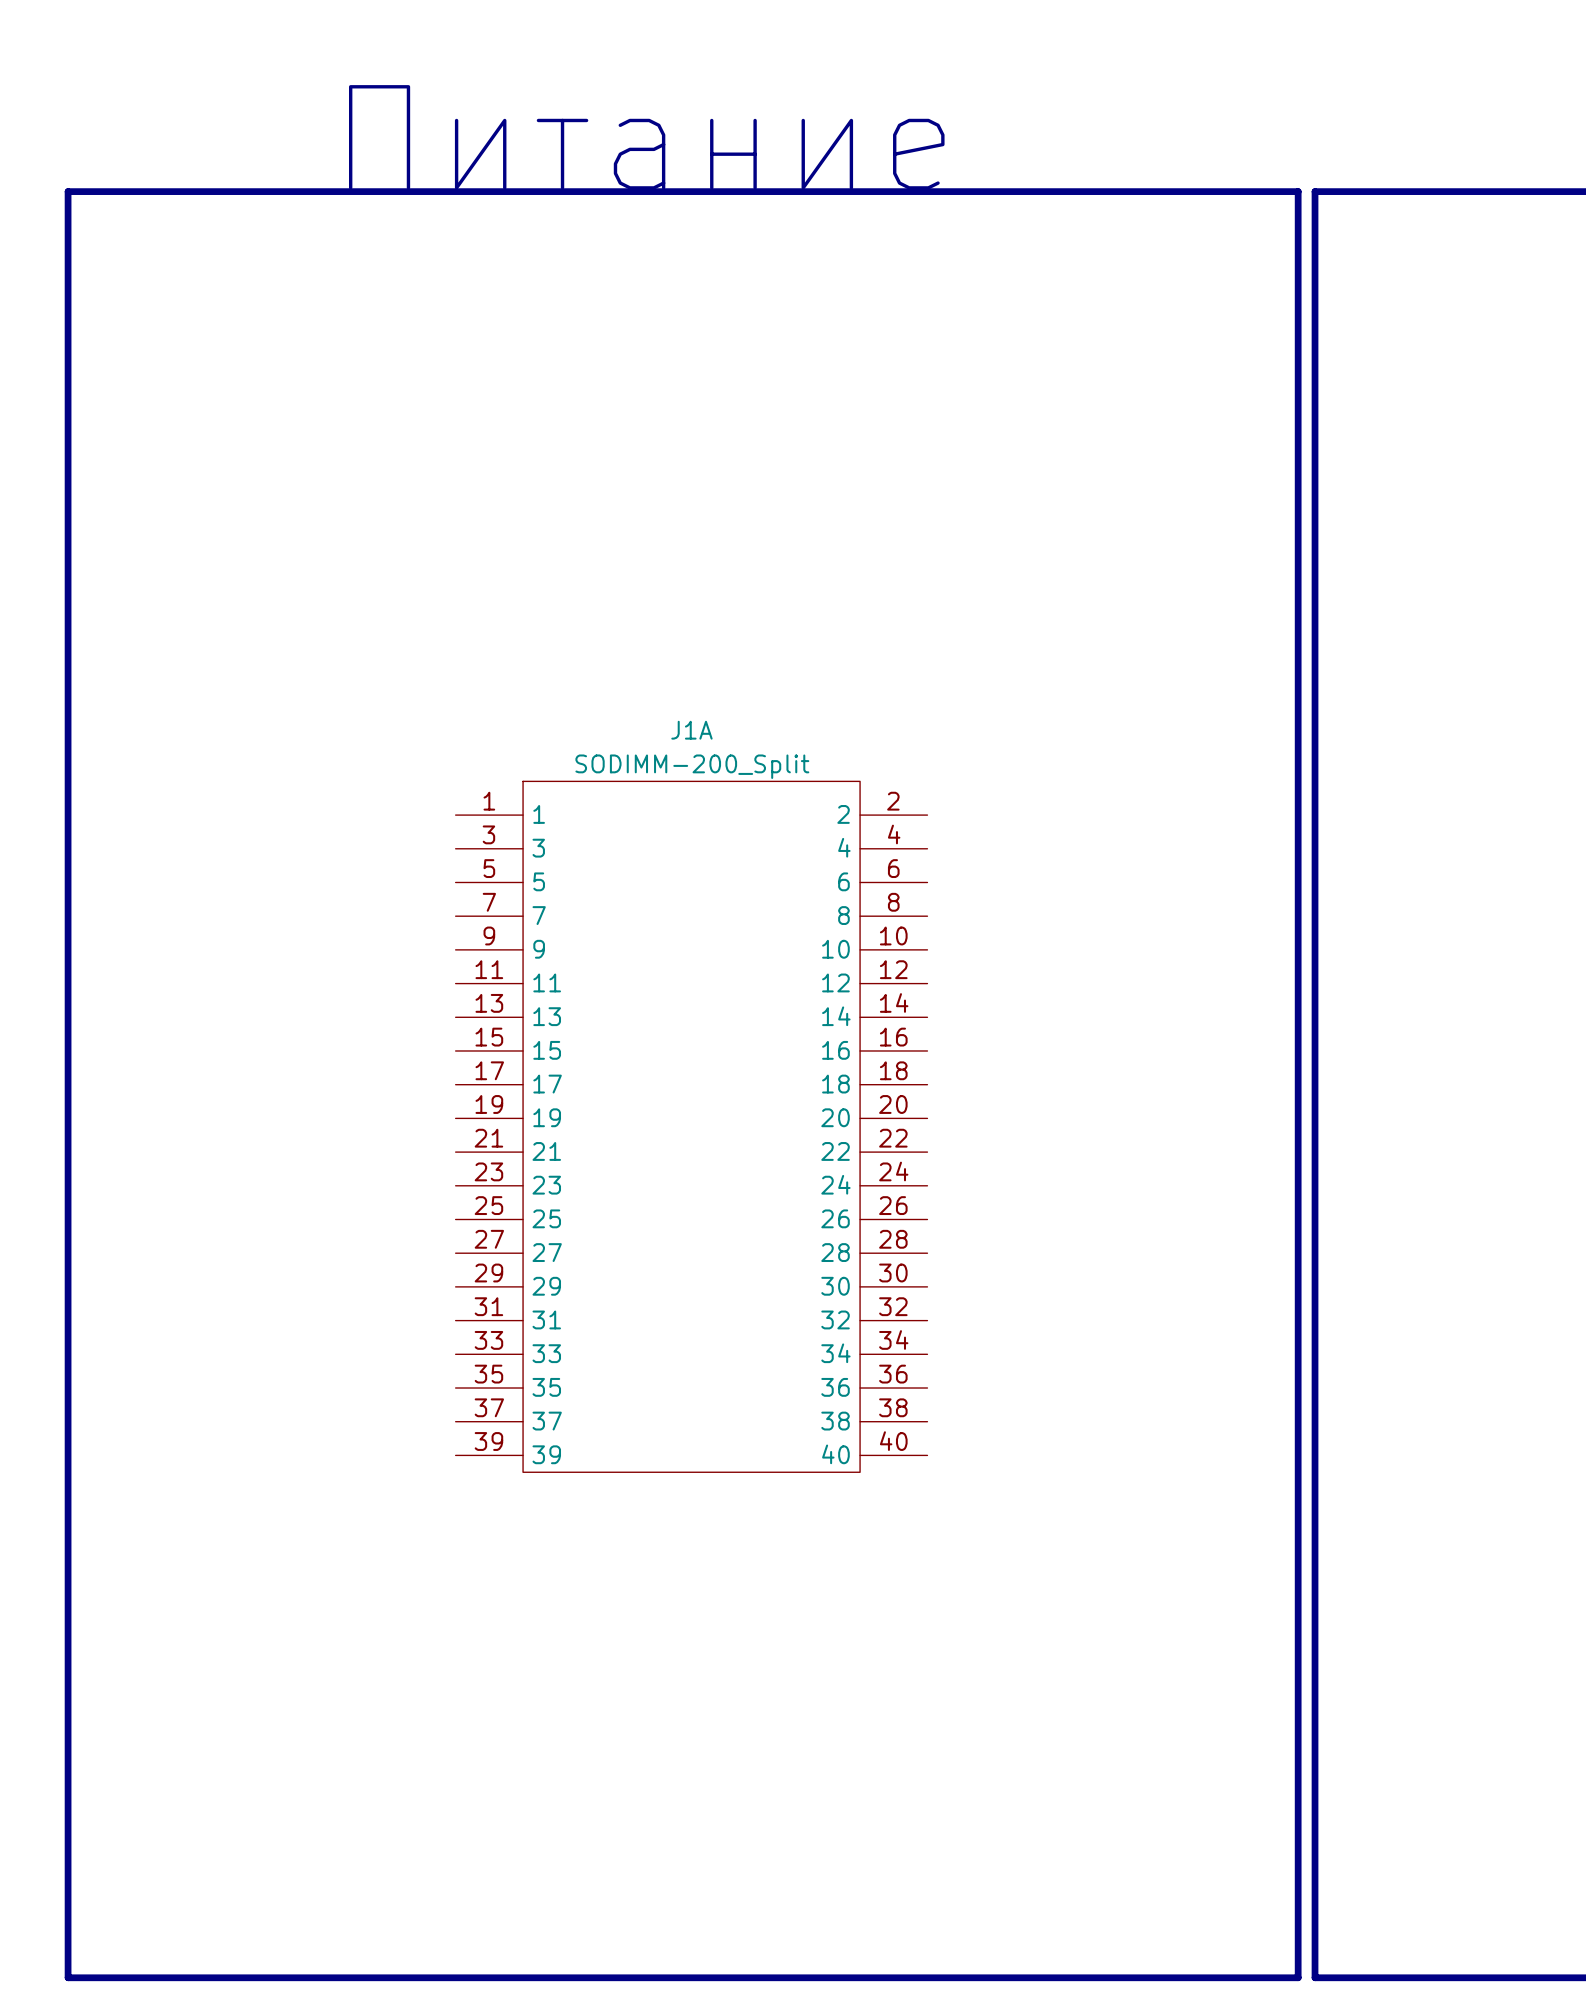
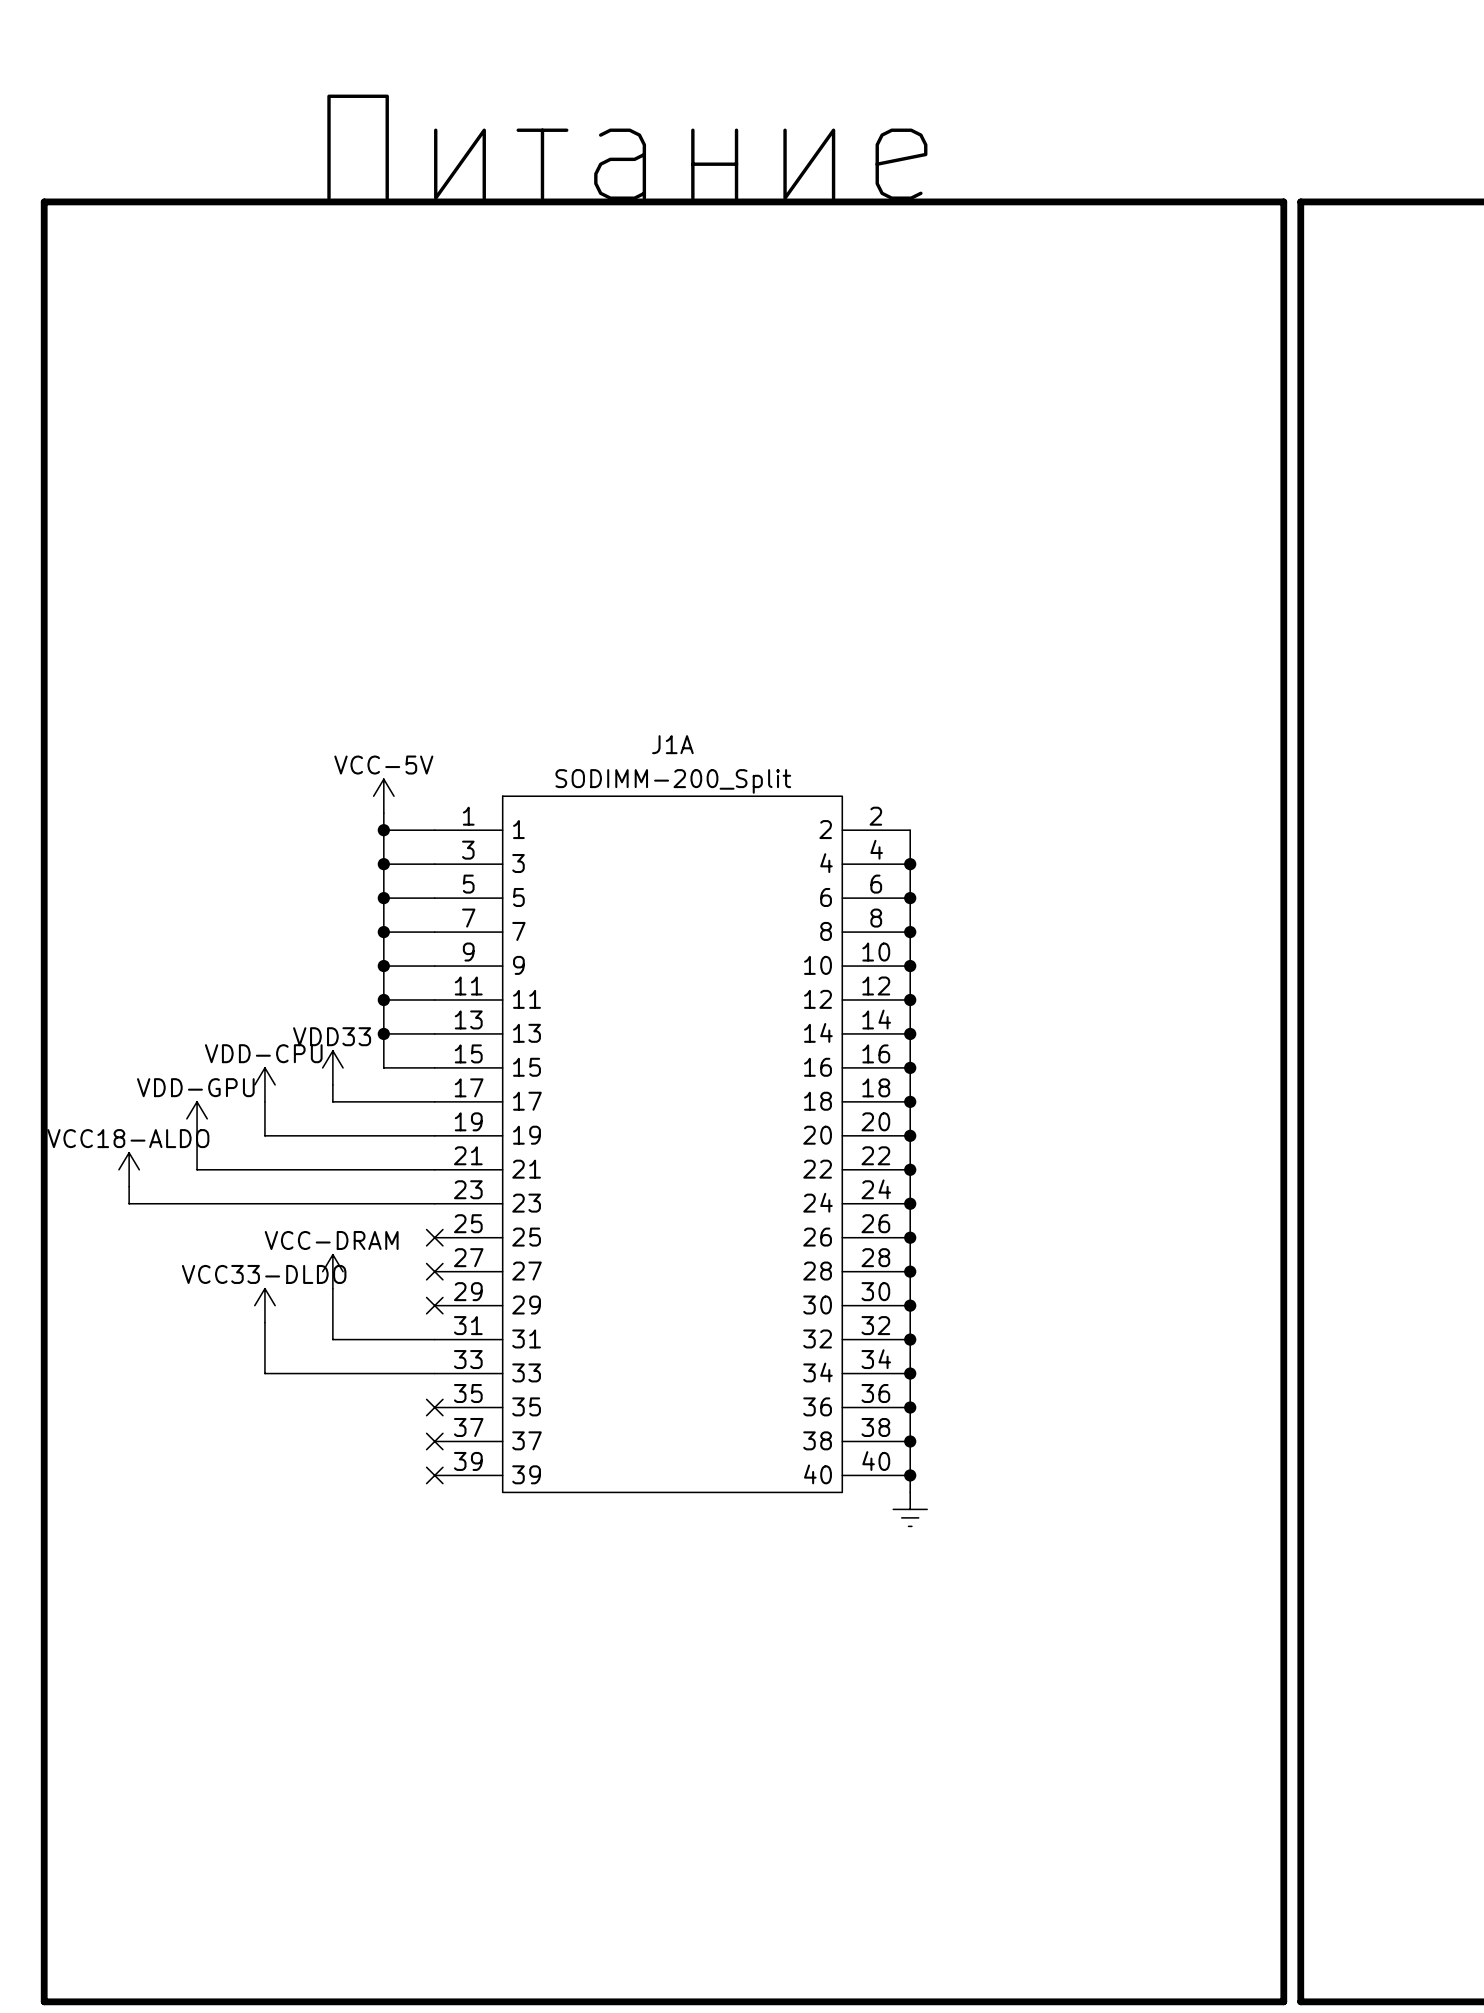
power symbol: none -> VCC-5V (383, 796)
wire: none -> (383, 813) (383, 1067) (434, 1067)
wire: none -> (383, 830) (434, 830)
junction: none -> (383, 830)
wire: none -> (910, 830) (910, 1492)
wire: none -> (383, 864) (434, 864)
junction: none -> (383, 864)
junction: none -> (910, 864)
wire: none -> (383, 898) (434, 898)
junction: none -> (383, 898)
junction: none -> (910, 898)
wire: none -> (383, 932) (434, 932)
junction: none -> (383, 932)
junction: none -> (910, 932)
wire: none -> (383, 966) (434, 966)
junction: none -> (383, 966)
junction: none -> (910, 966)
wire: none -> (383, 999) (434, 999)
junction: none -> (383, 999)
junction: none -> (910, 999)
wire: none -> (383, 1033) (434, 1033)
junction: none -> (383, 1033)
junction: none -> (910, 1033)
power symbol: none -> VDD33 (332, 1067)
junction: none -> (910, 1067)
power symbol: none -> VDD-CPU (264, 1084)
wire: none -> (332, 1084) (332, 1101) (434, 1101)
wire: none -> (264, 1101) (264, 1135) (434, 1135)
junction: none -> (910, 1101)
power symbol: none -> VDD-GPU (197, 1118)
wire: none -> (197, 1135) (197, 1169) (434, 1169)
junction: none -> (910, 1135)
power symbol: none -> VCC18-ALDO (129, 1169)
junction: none -> (910, 1169)
wire: none -> (129, 1186) (129, 1203) (434, 1203)
junction: none -> (910, 1203)
no-connect mark: none -> (434, 1237)
junction: none -> (910, 1237)
power symbol: none -> VCC-DRAM (332, 1271)
no-connect mark: none -> (434, 1271)
junction: none -> (910, 1271)
wire: none -> (332, 1288) (332, 1339) (434, 1339)
power symbol: none -> VCC33-DLDO (264, 1305)
no-connect mark: none -> (434, 1305)
junction: none -> (910, 1305)
wire: none -> (264, 1322) (264, 1373) (434, 1373)
junction: none -> (910, 1339)
junction: none -> (910, 1373)
no-connect mark: none -> (434, 1407)
junction: none -> (910, 1407)
no-connect mark: none -> (434, 1441)
junction: none -> (910, 1441)
no-connect mark: none -> (434, 1475)
junction: none -> (910, 1475)
power symbol: none -> (910, 1509)

